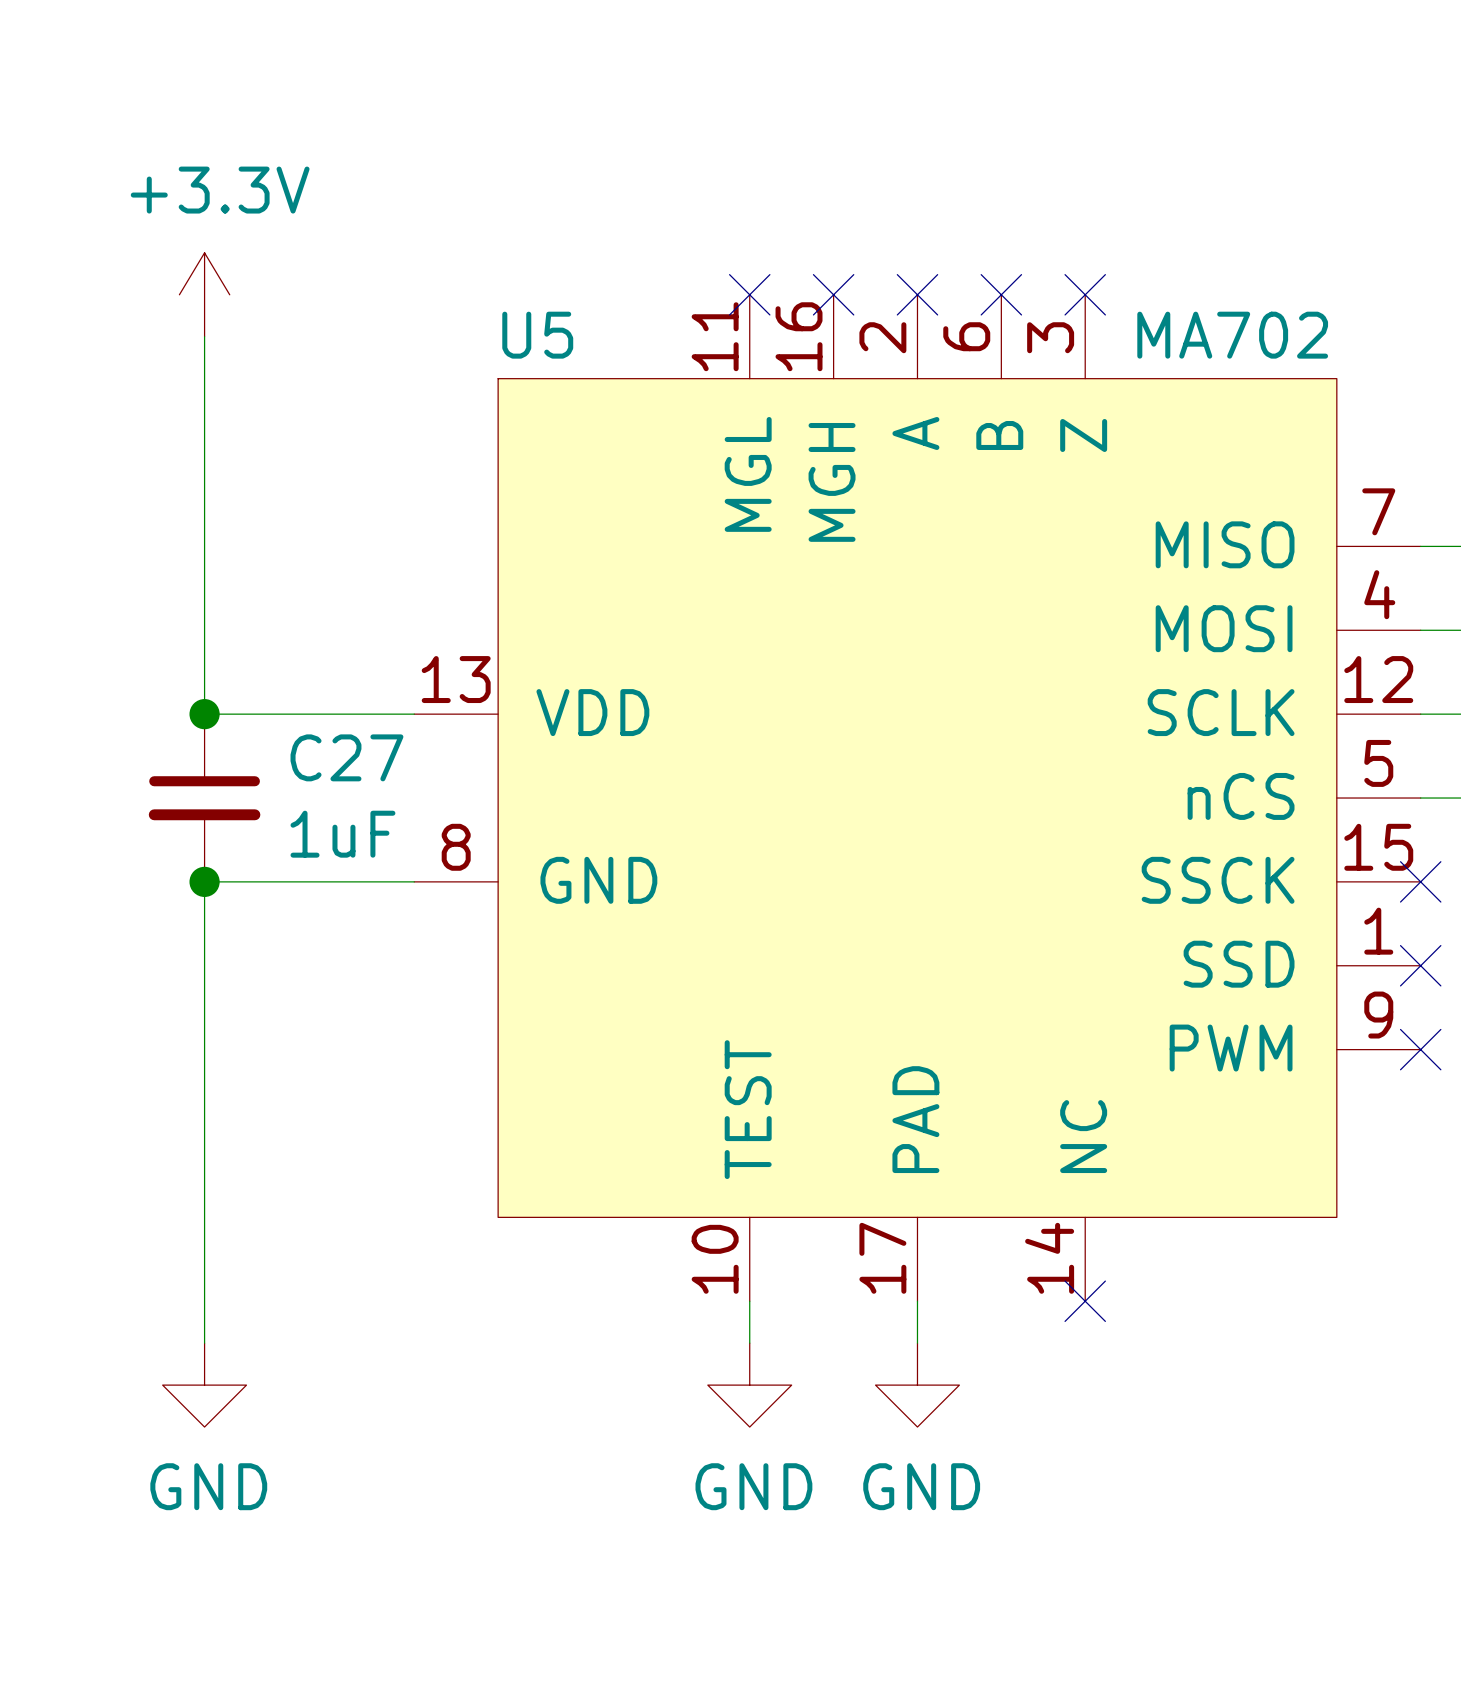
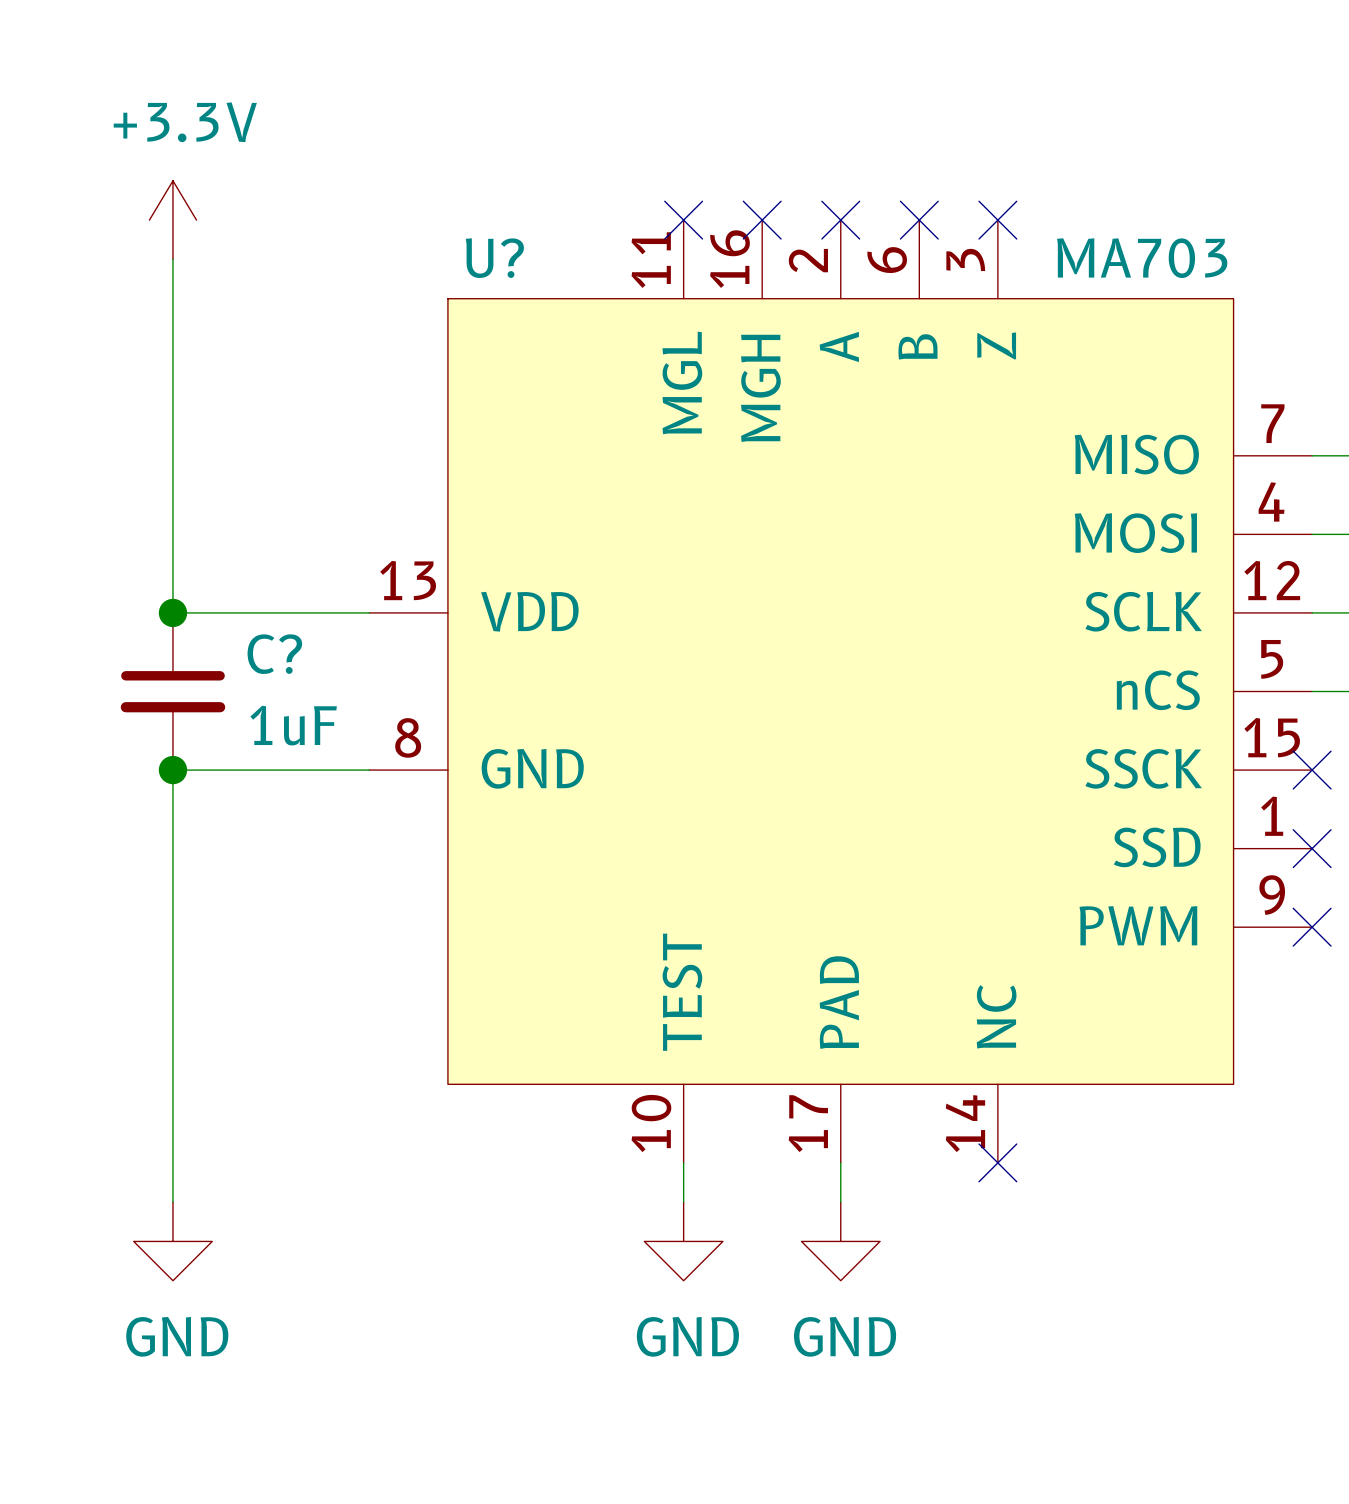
U5 name: U5 (537, 335) -> U? (494, 258)
U5 value: MA702 (1232, 335) -> MA703 (1142, 258)
C27 name: C27 (346, 757) -> C? (274, 654)

